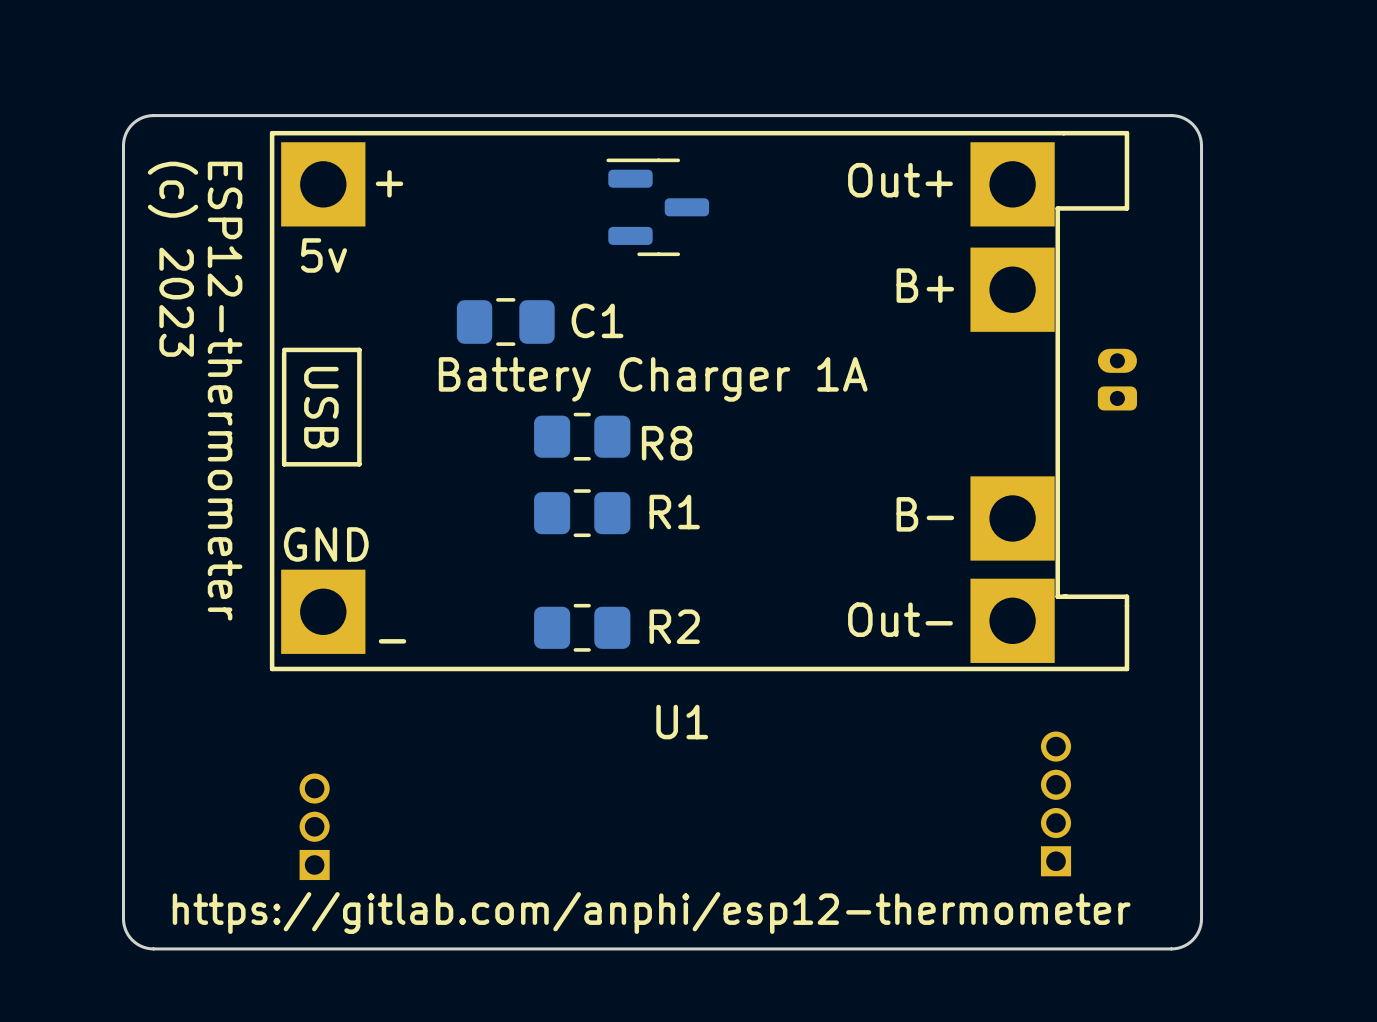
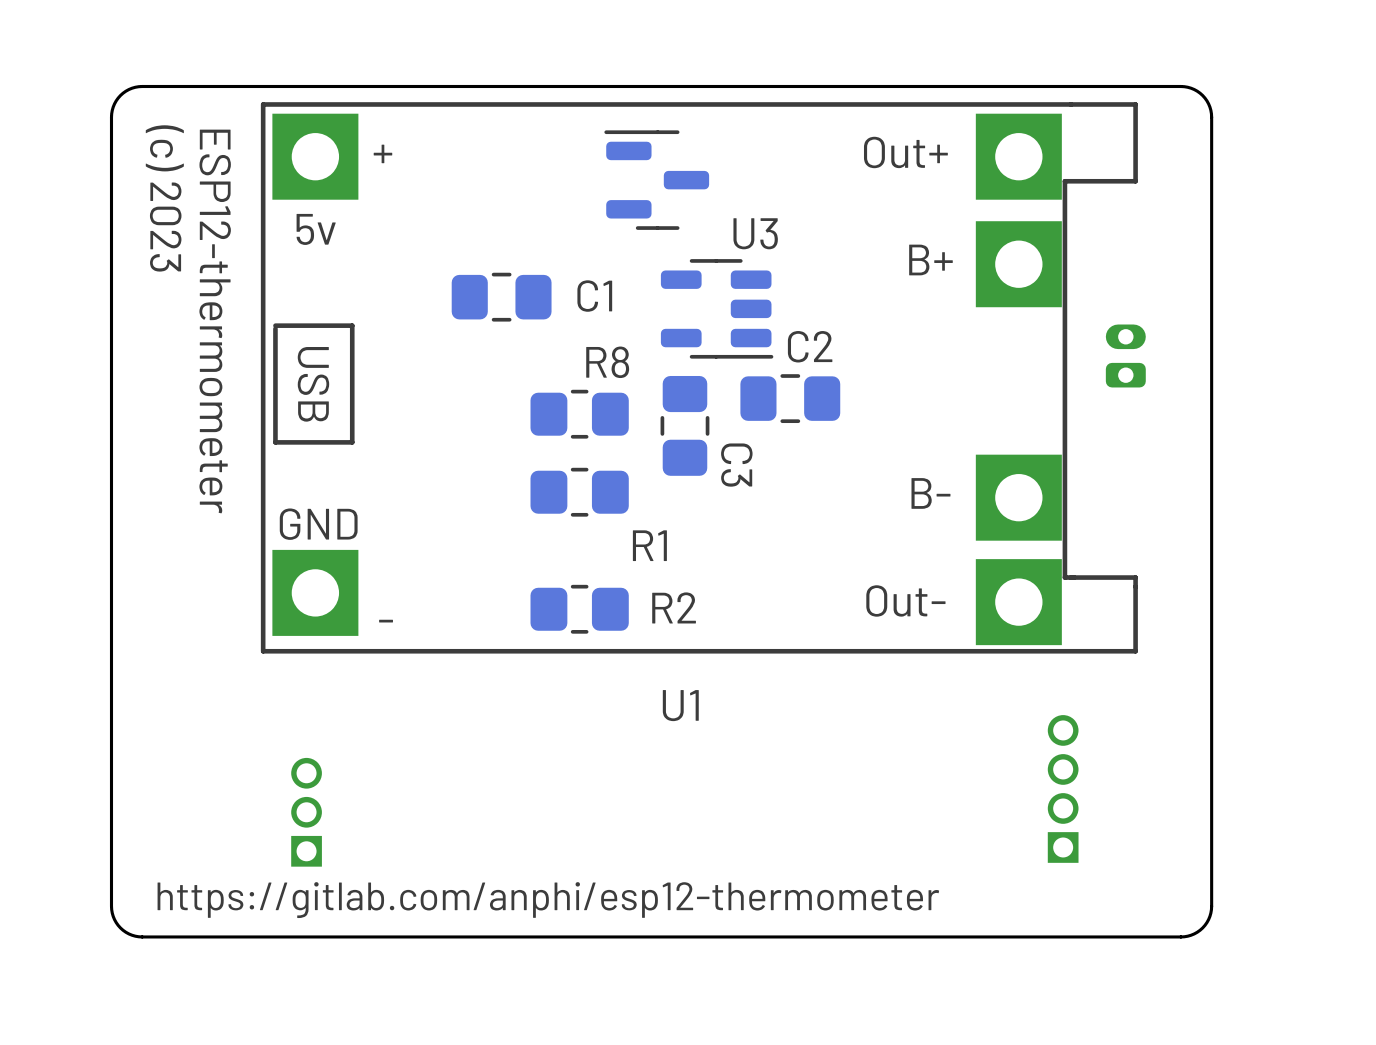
U3: none -> (717, 308)
U1 text: Battery Charger 1A (653, 379) -> none
C2: none -> (790, 398)
R8 name position: R8 (667, 443) -> R8 (607, 362)
C3: none -> (684, 425)
R1 name position: R1 (674, 512) -> R1 (649, 545)

